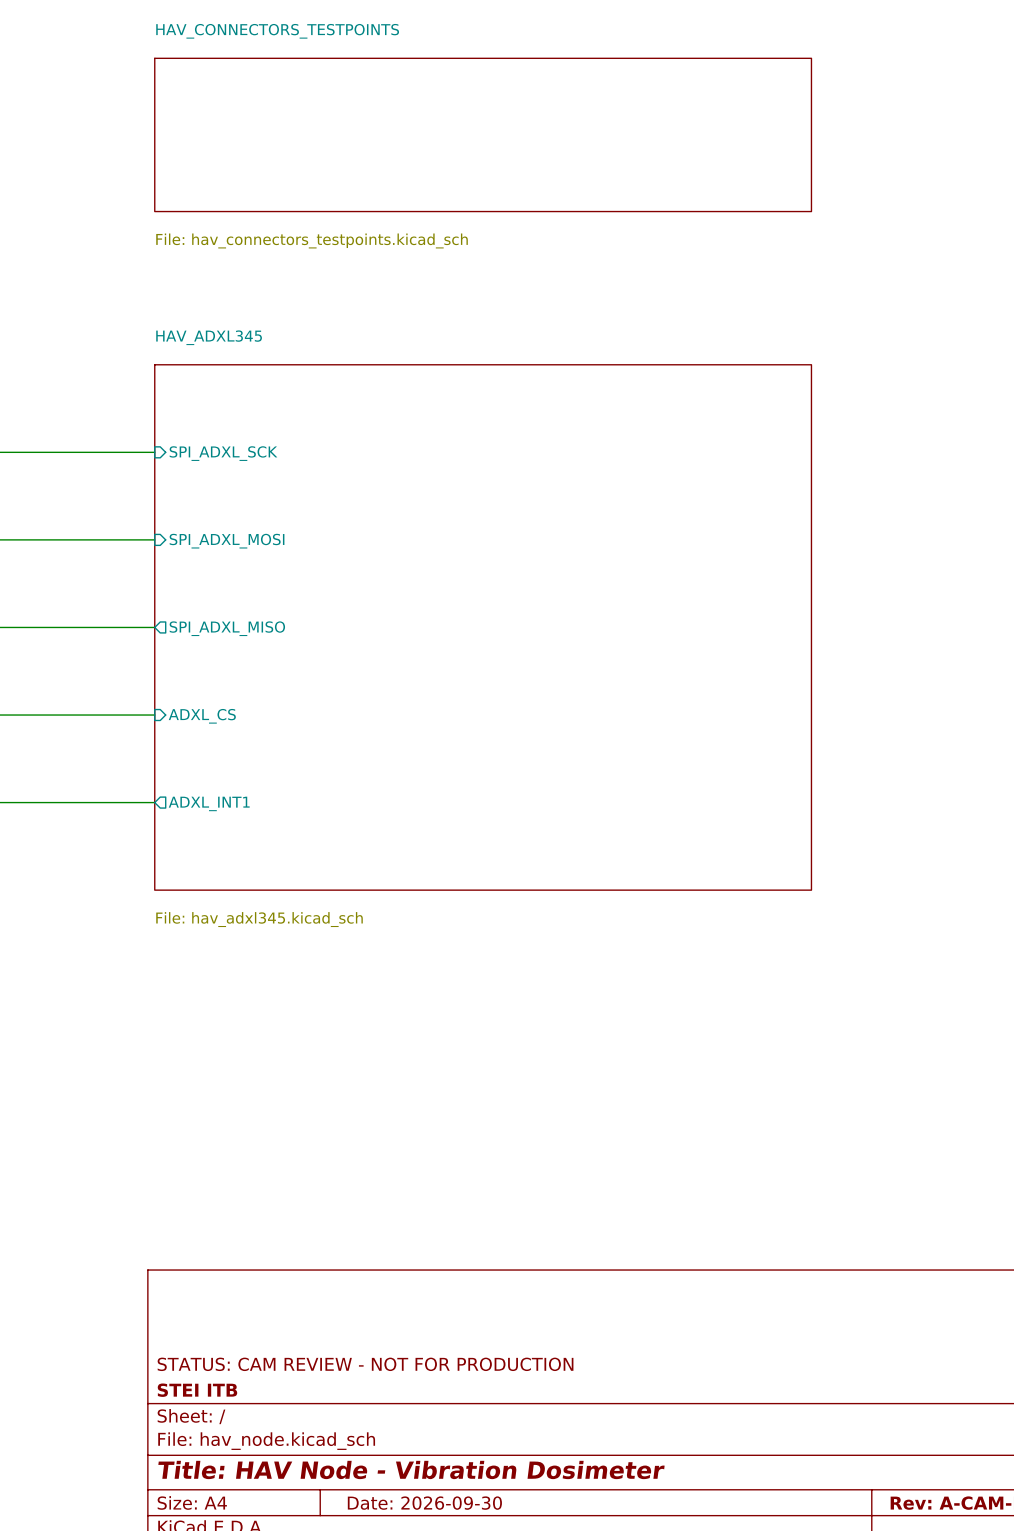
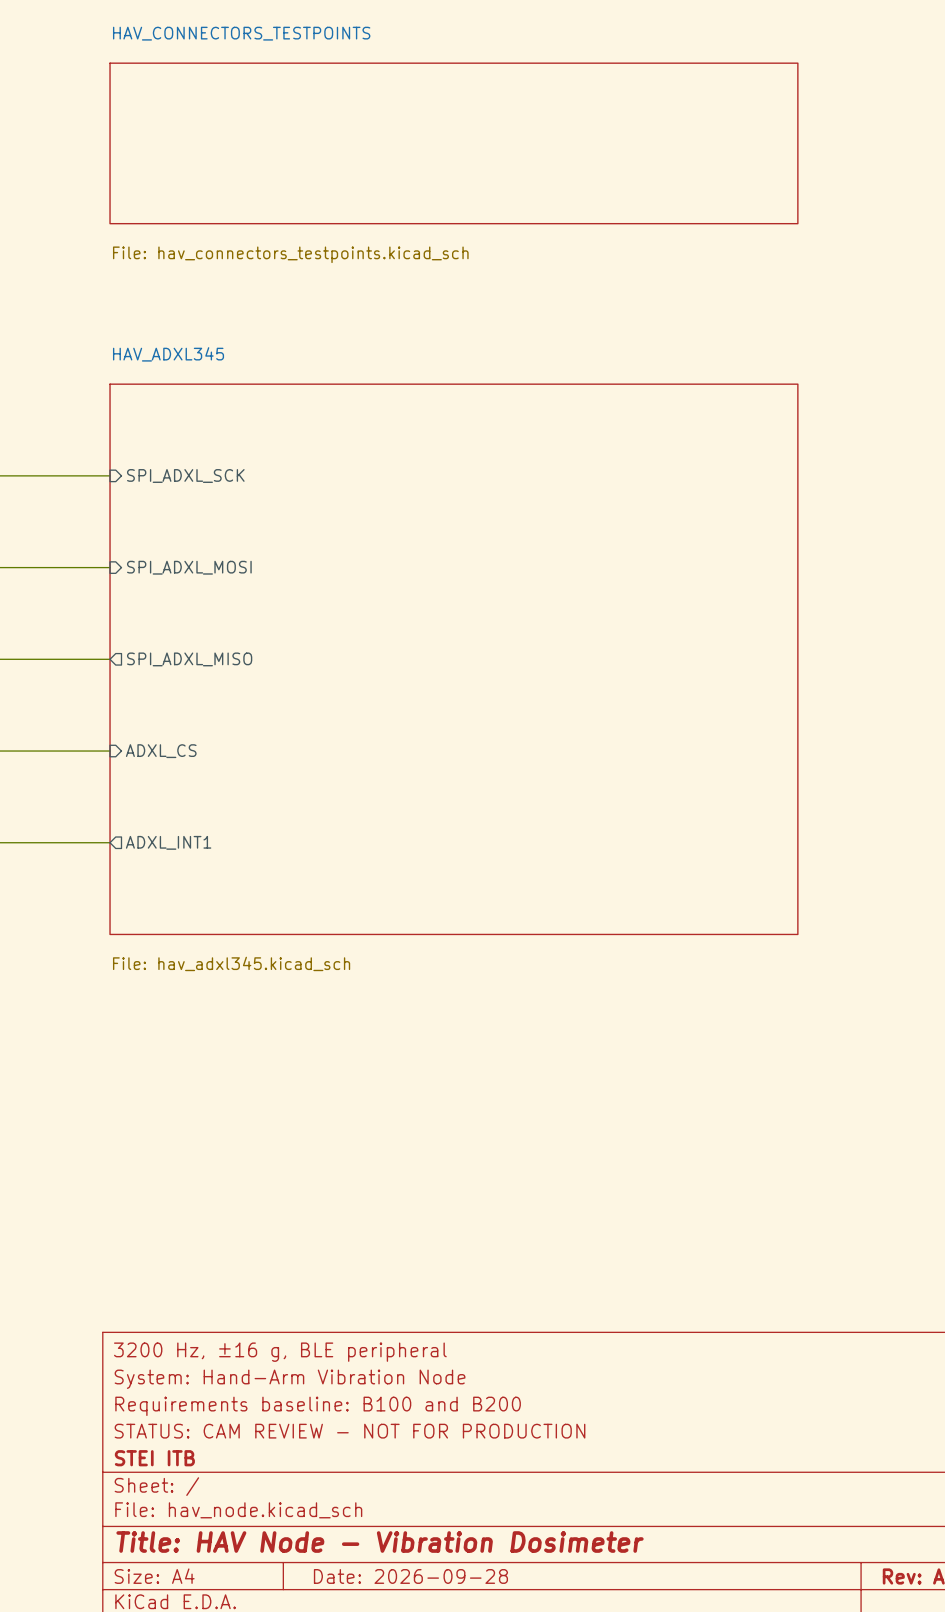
title block: none -> 3200 Hz, ±16 g, BLE peripheral (280, 1352)
title block: none -> System: Hand-Arm Vibration Node (290, 1379)
title block: none -> Requirements baseline: B100 and B200 (318, 1406)
title block: Date: 2026-09-30 (424, 1503) -> Date: 2026-09-28 (410, 1576)

